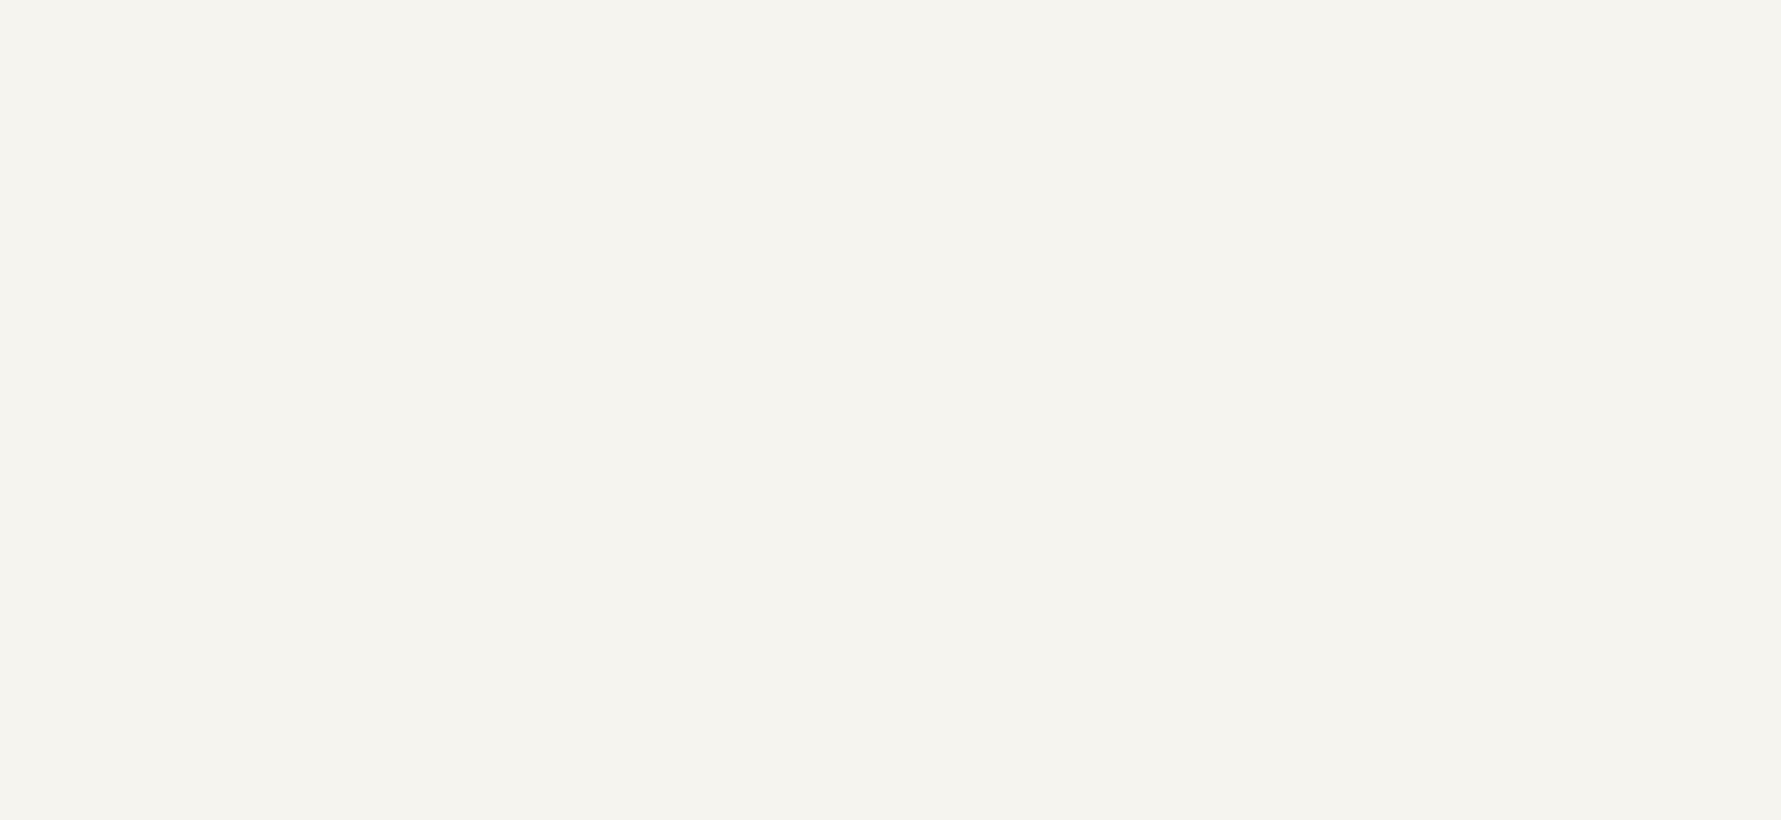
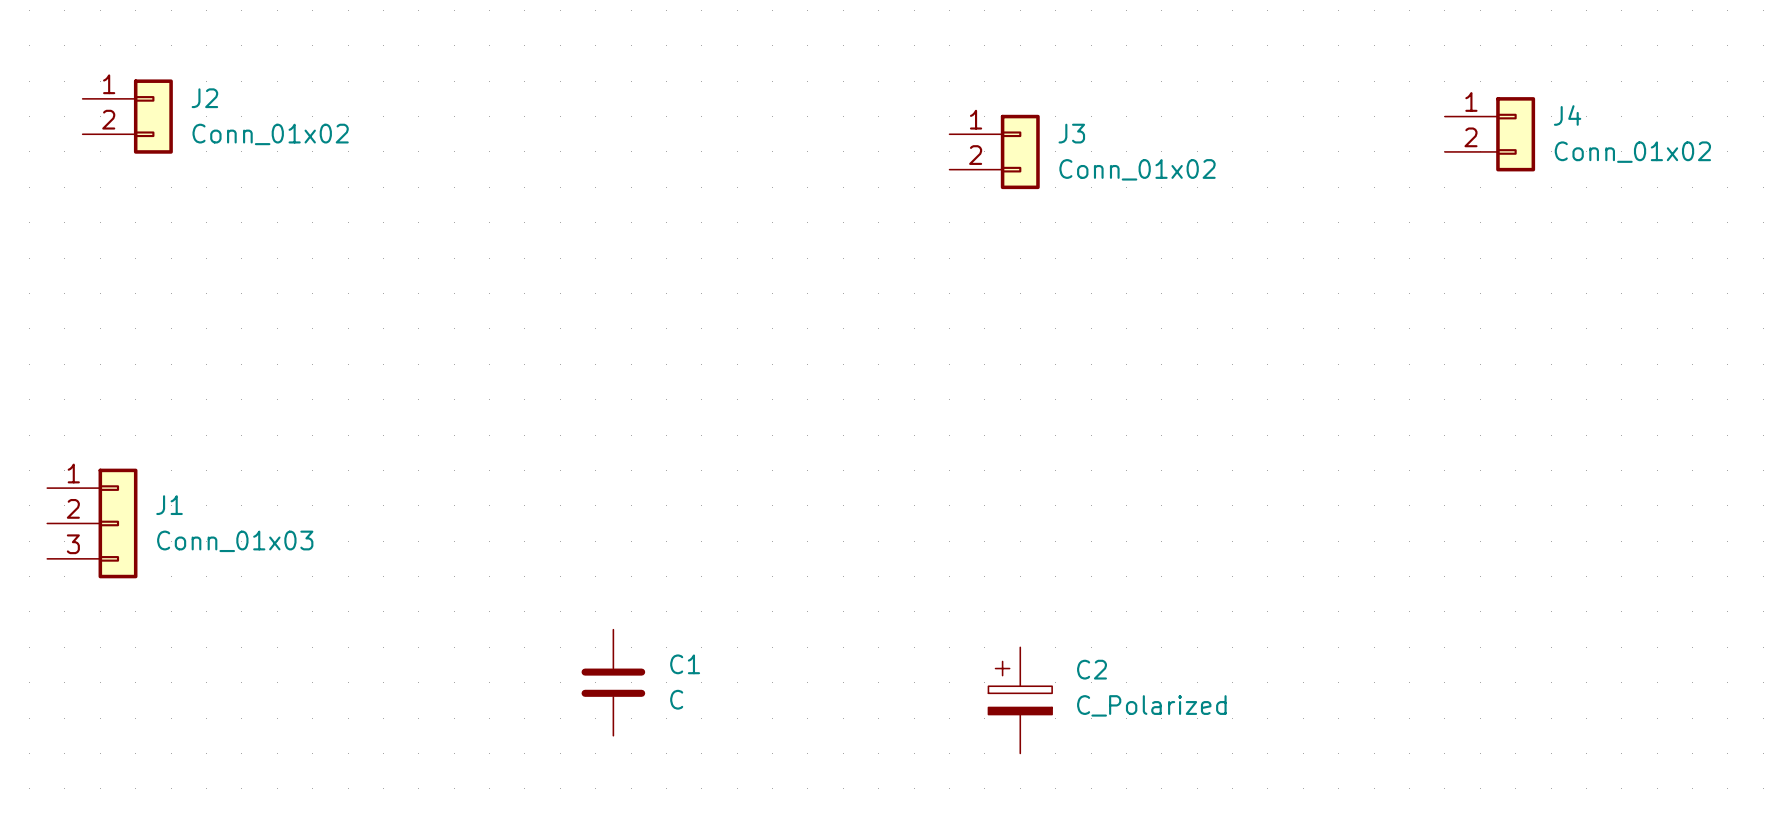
J2: none -> Conn_01x02 (127, 116)
J4: none -> Conn_01x02 (1489, 134)
J3: none -> Conn_01x02 (994, 151)
J1: none -> Conn_01x03 (92, 523)
C1: none -> C (613, 682)
C2: none -> C_Polarized (1020, 700)

